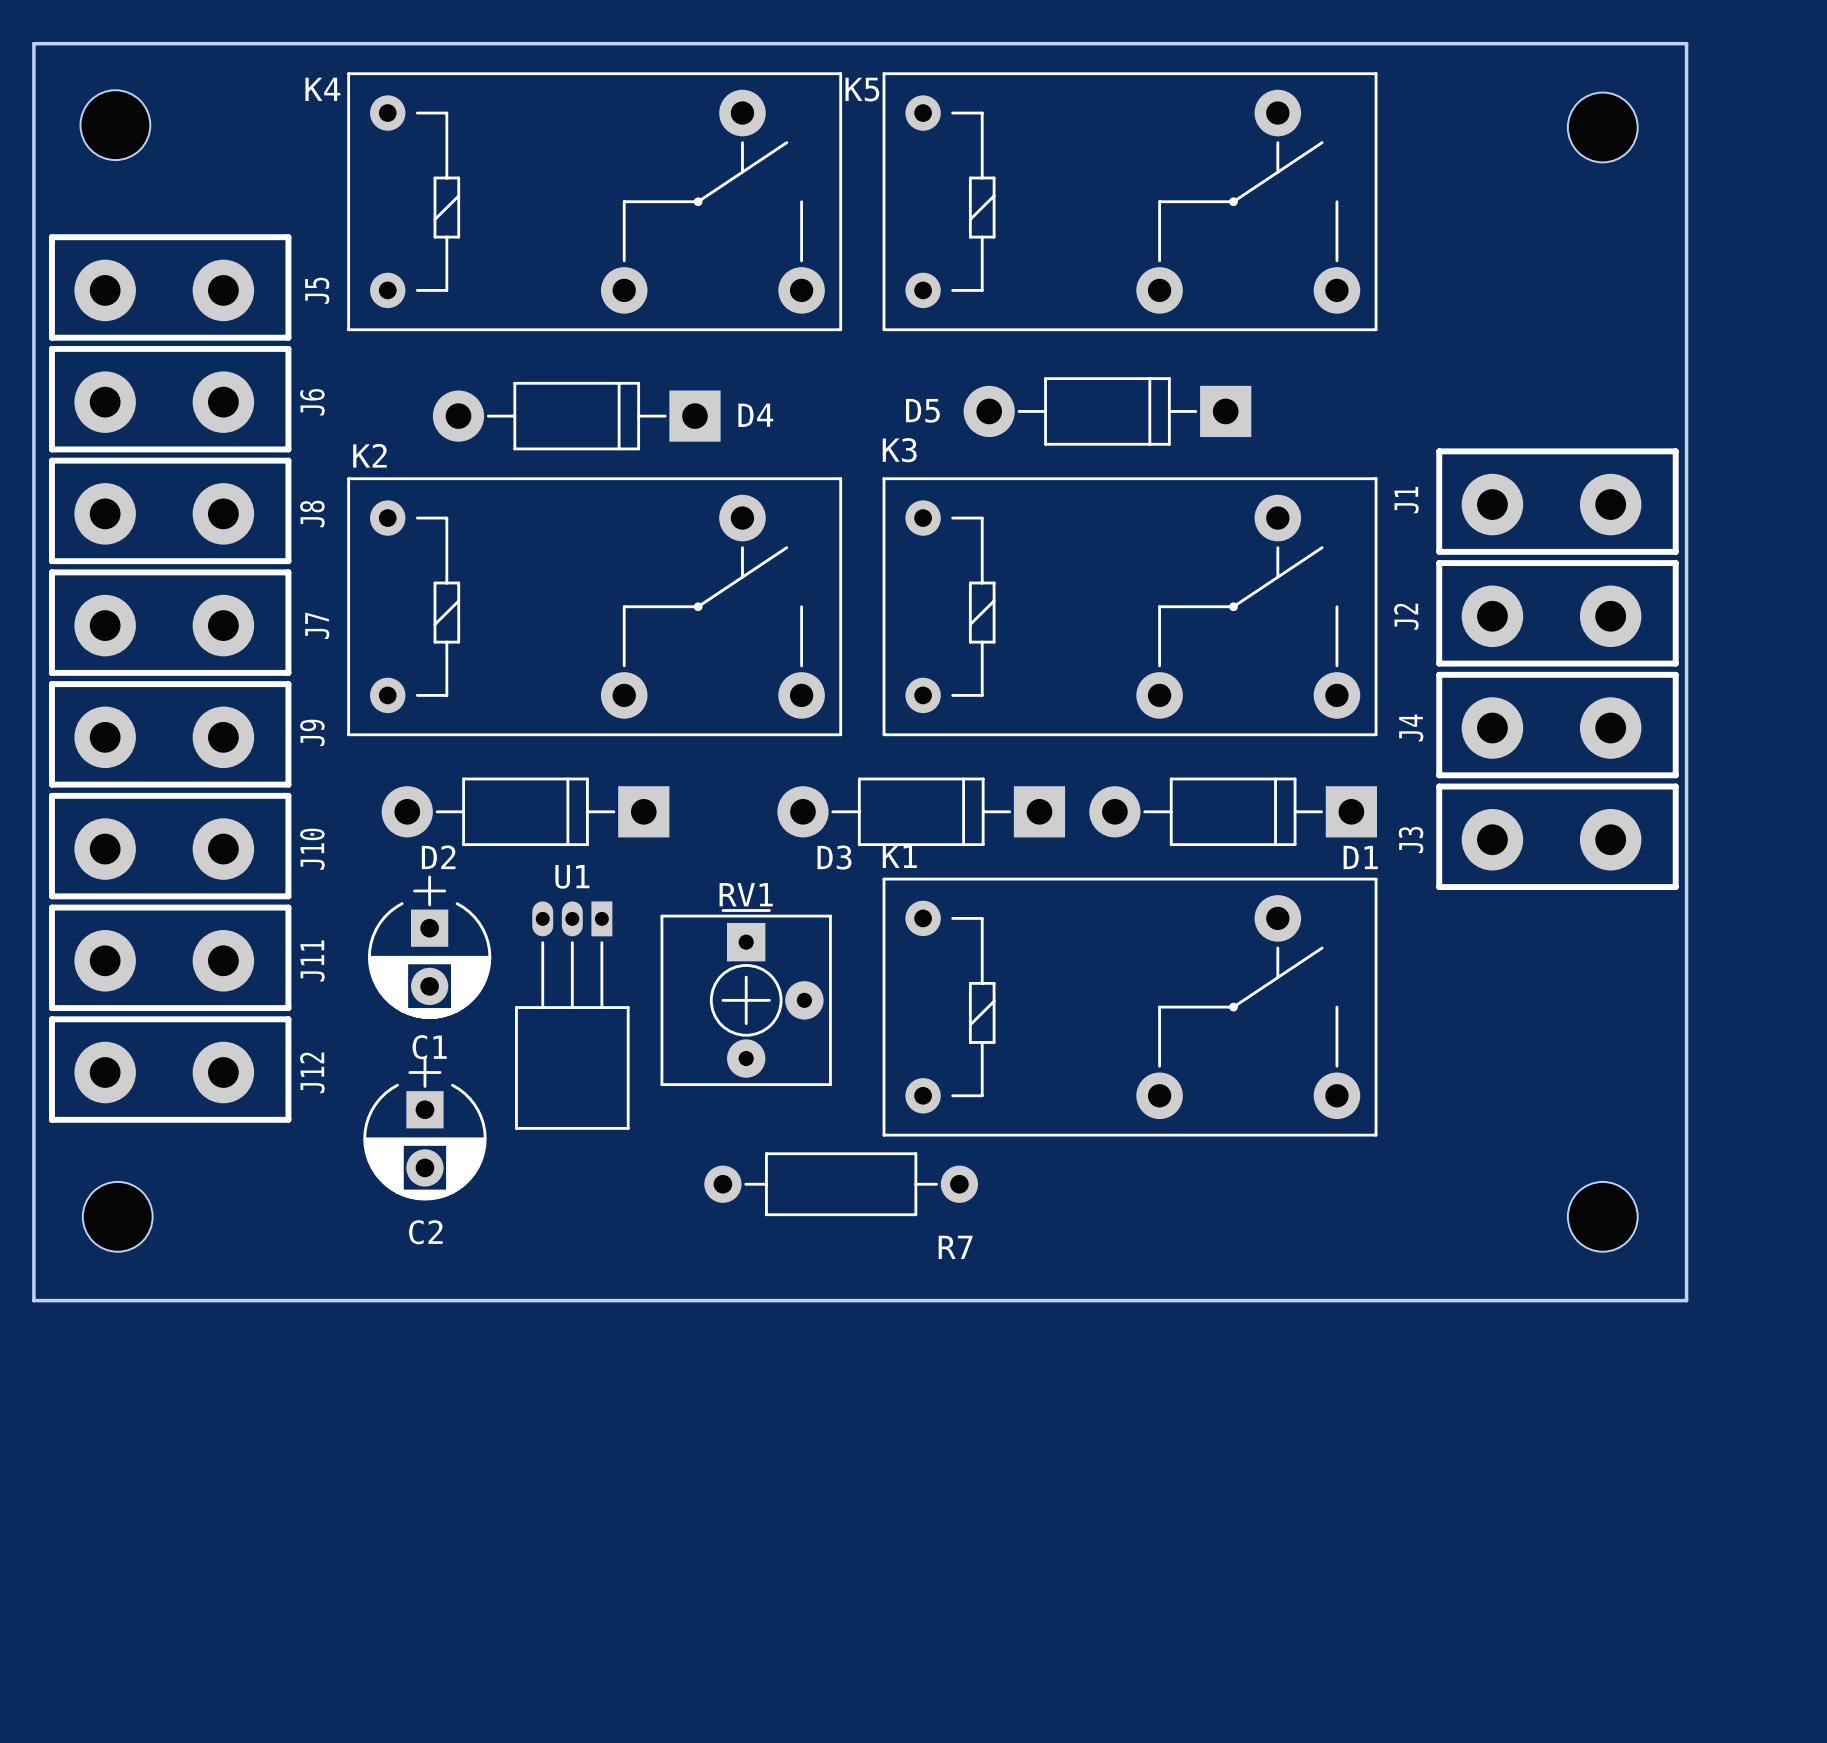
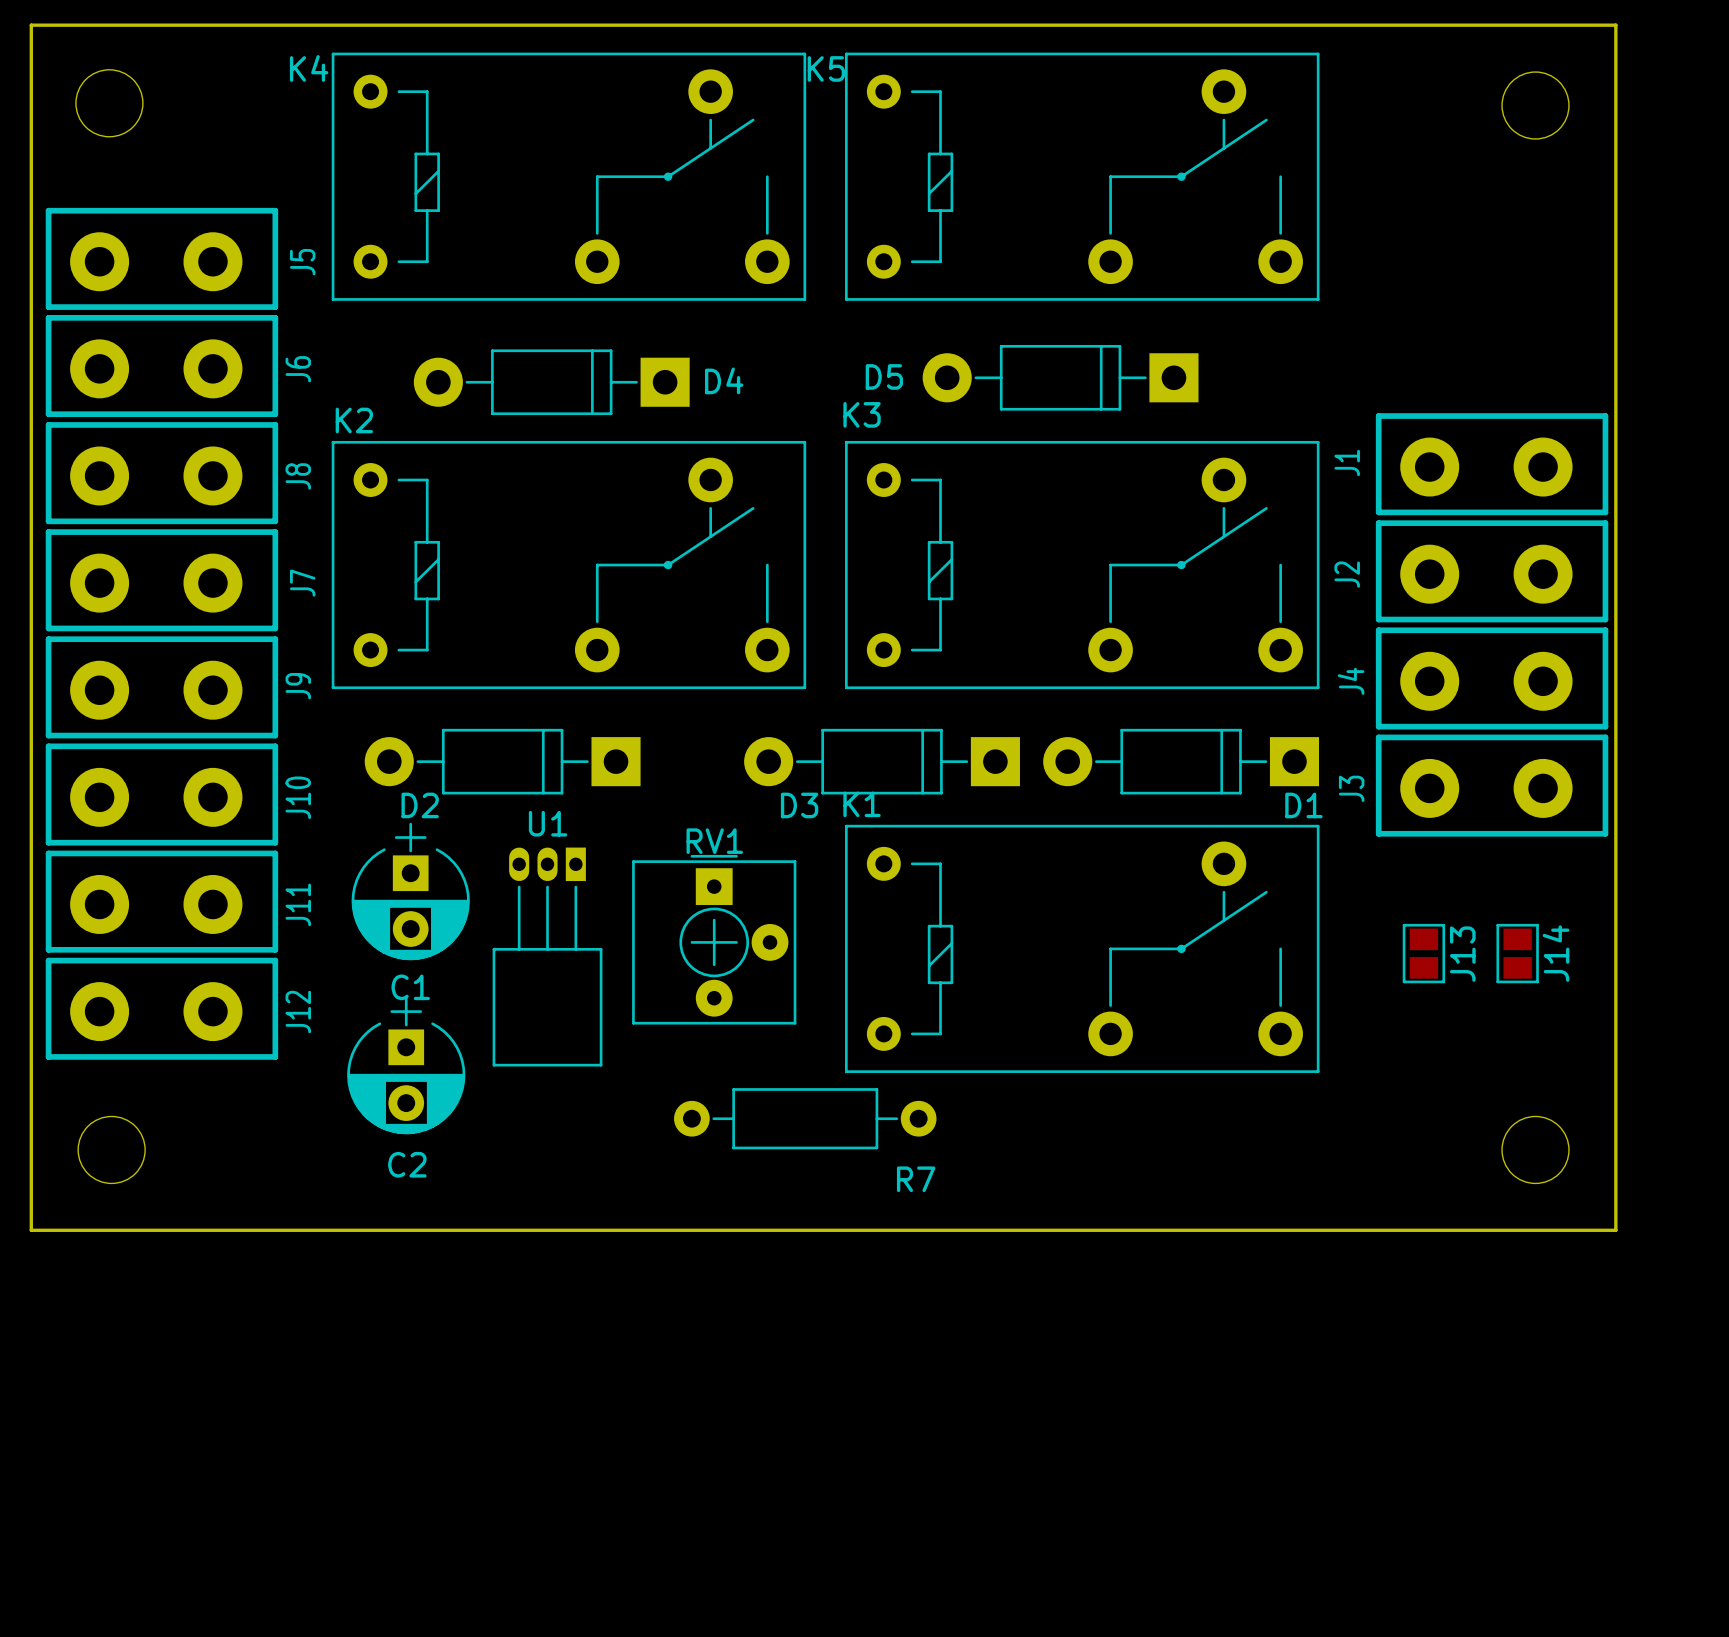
J13: none -> (1423, 953)
J14: none -> (1517, 953)

